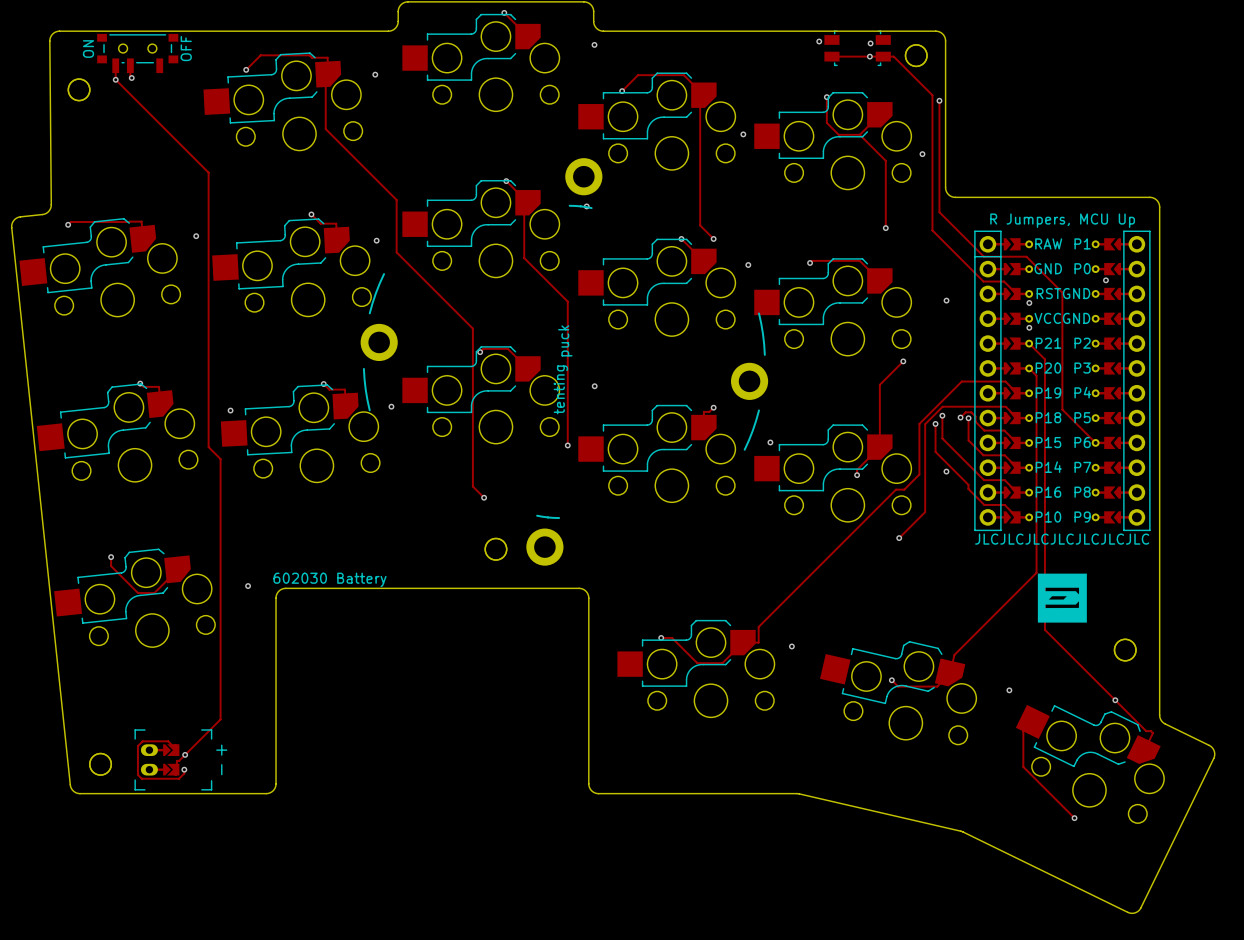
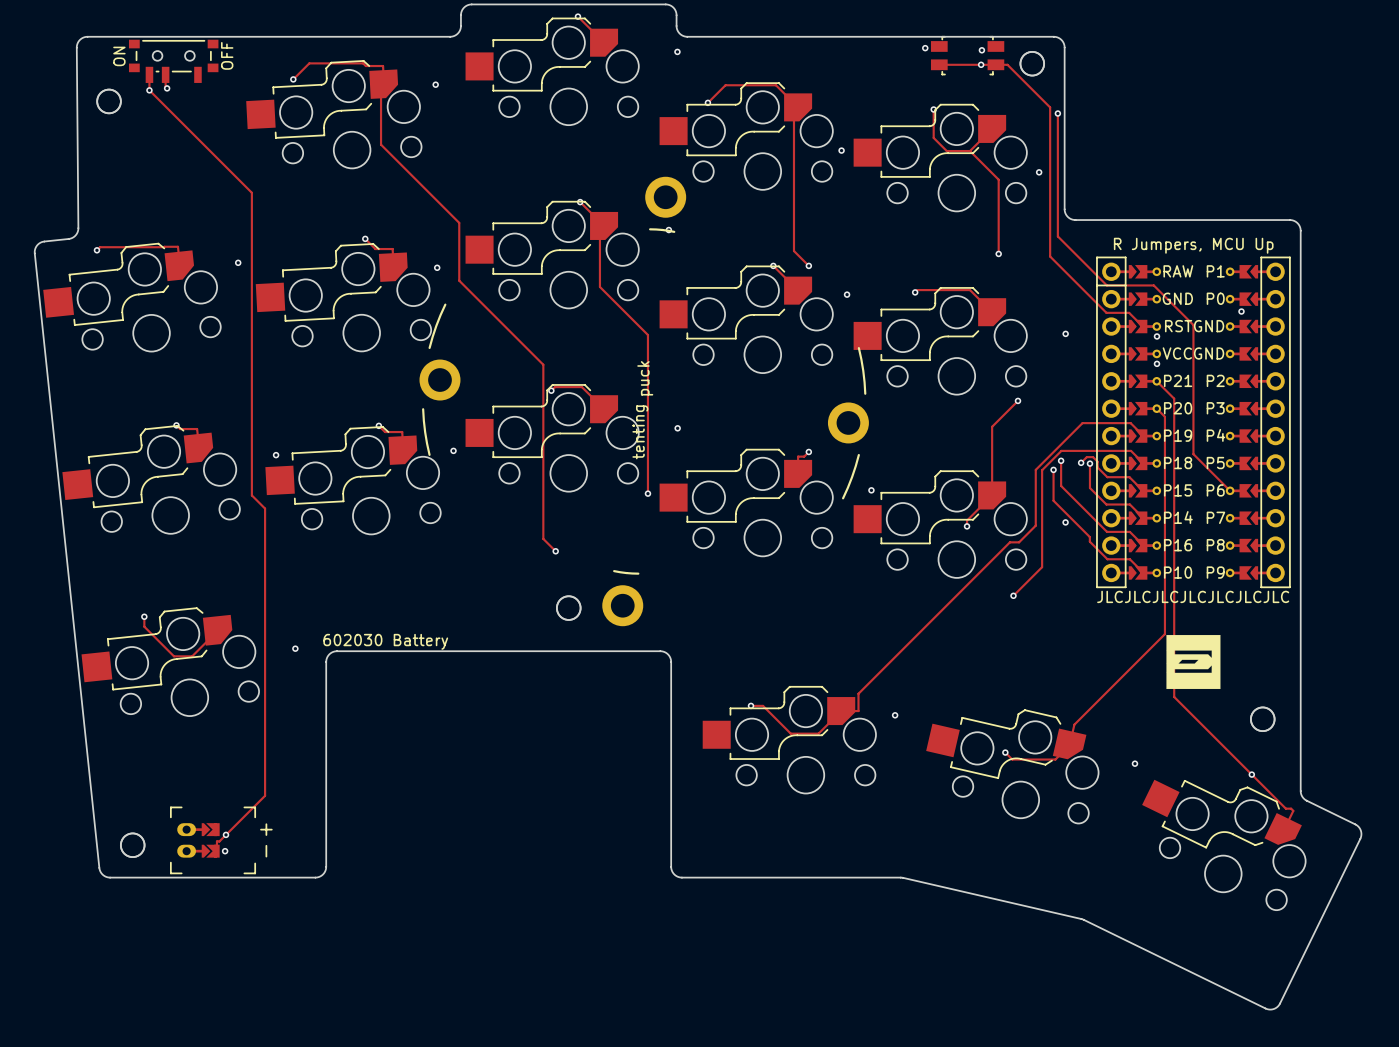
track: (1032, 721) (1023, 731) (1023, 766) (1074, 818) -> none
track: (176, 750) (168, 741) (142, 741) (137, 746) (137, 774) (141, 778) (179, 778) (184, 773) (184, 769) -> none
via: (1074, 818) -> none

